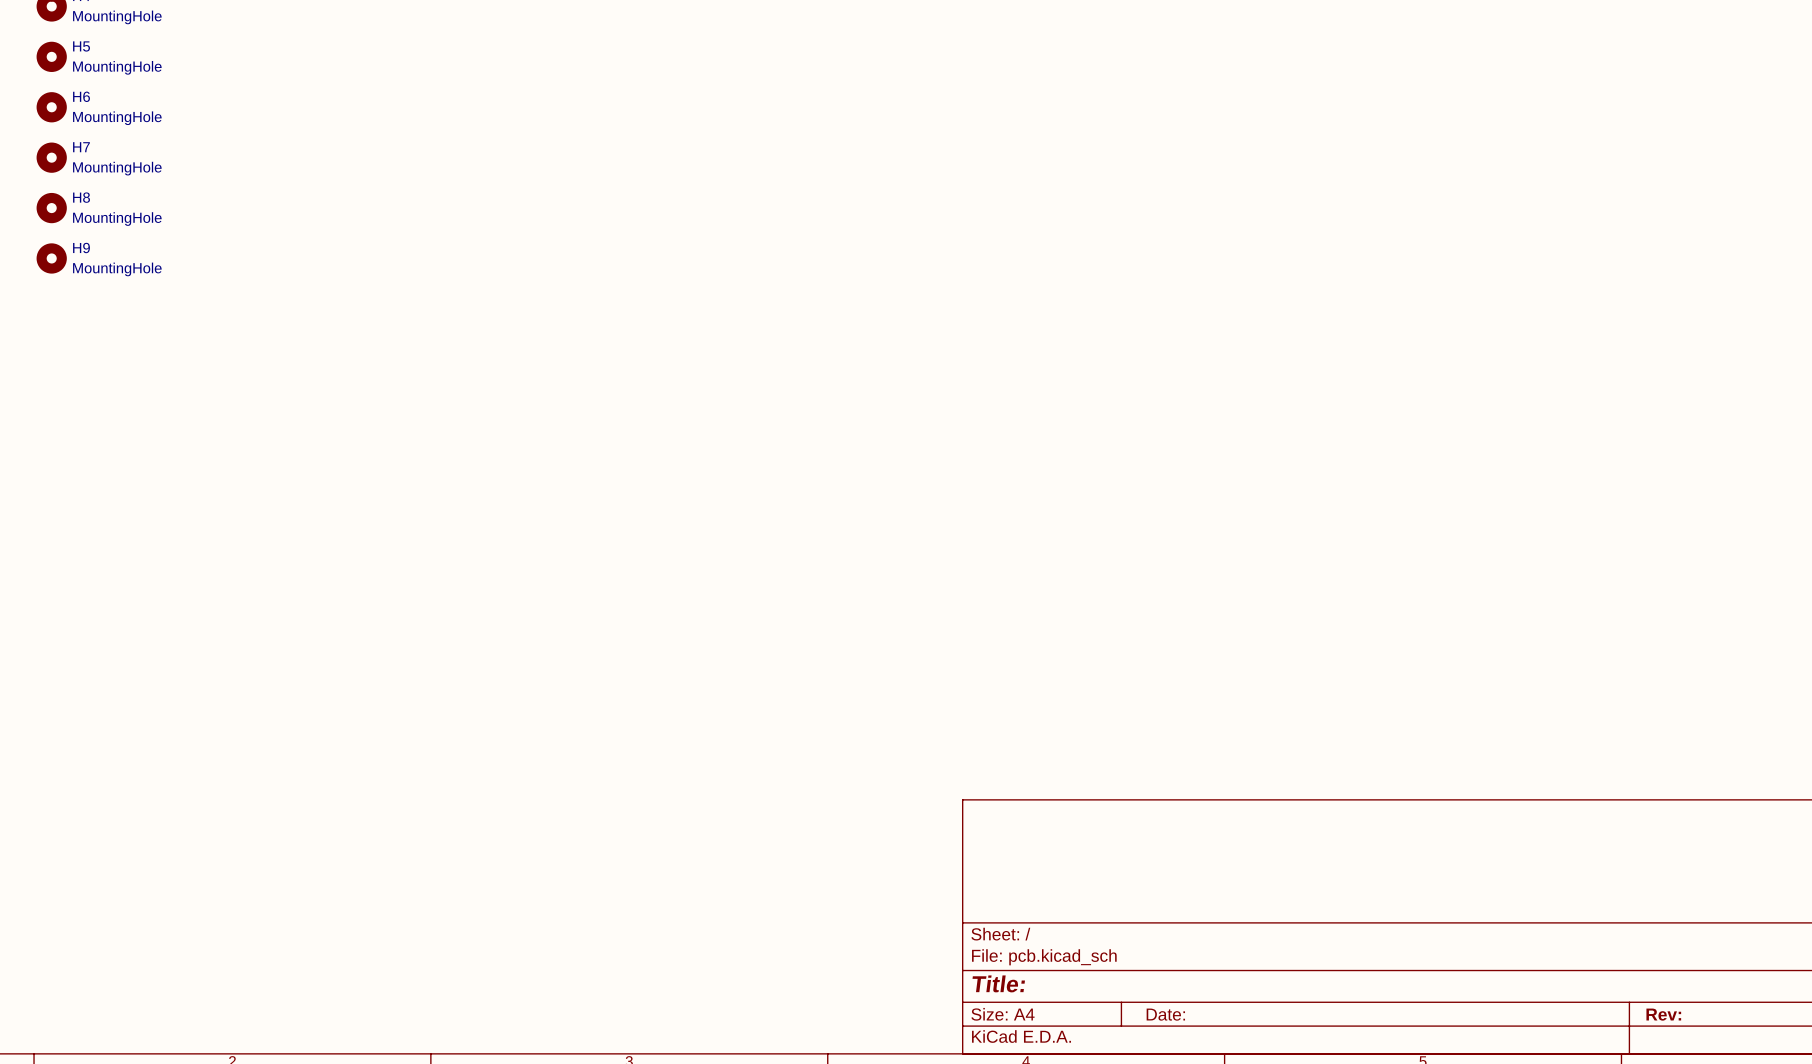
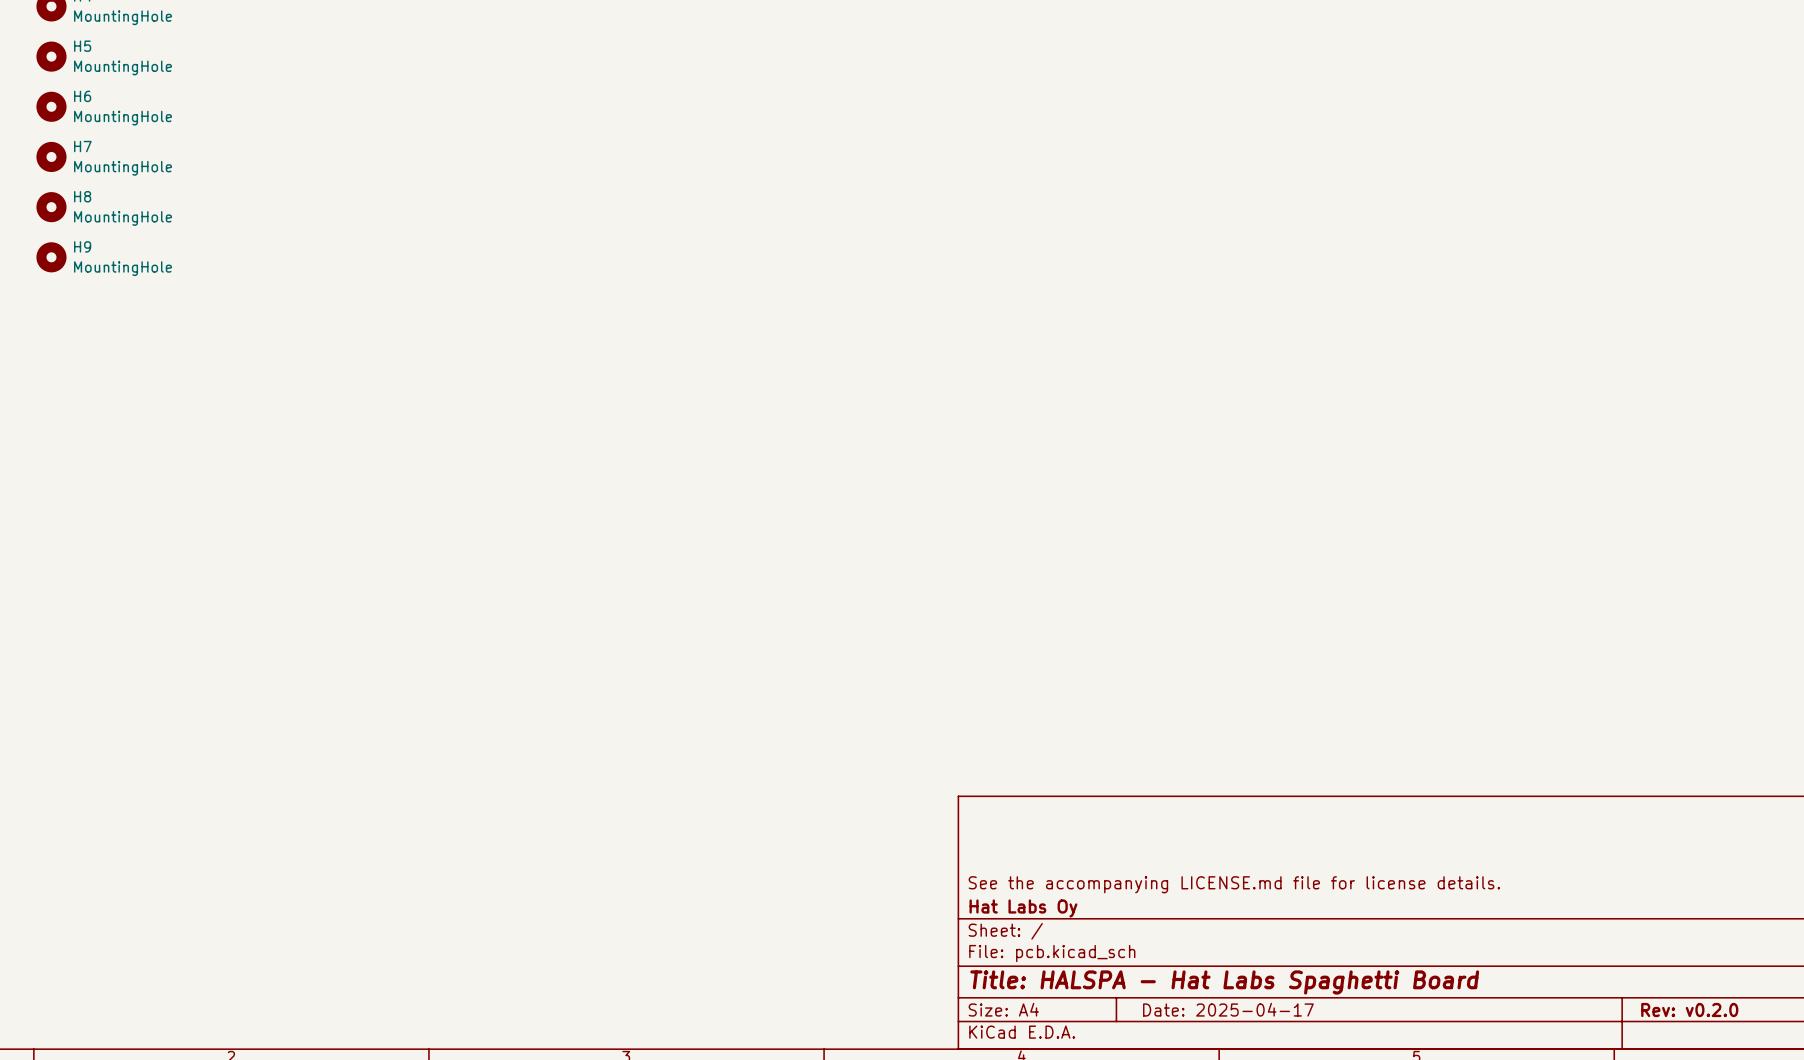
title block: none -> See the accompanying LICENSE.md file for license details. (1234, 884)
title block: none -> Hat Labs Oy (1023, 908)
title block: Title: (998, 983) -> Title: HALSPA - Hat Labs Spaghetti Board (1224, 982)
title block: Date: (1165, 1014) -> Date: 2025-04-17 (1228, 1009)
title block: Rev: (1663, 1014) -> Rev: v0.2.0 (1689, 1010)

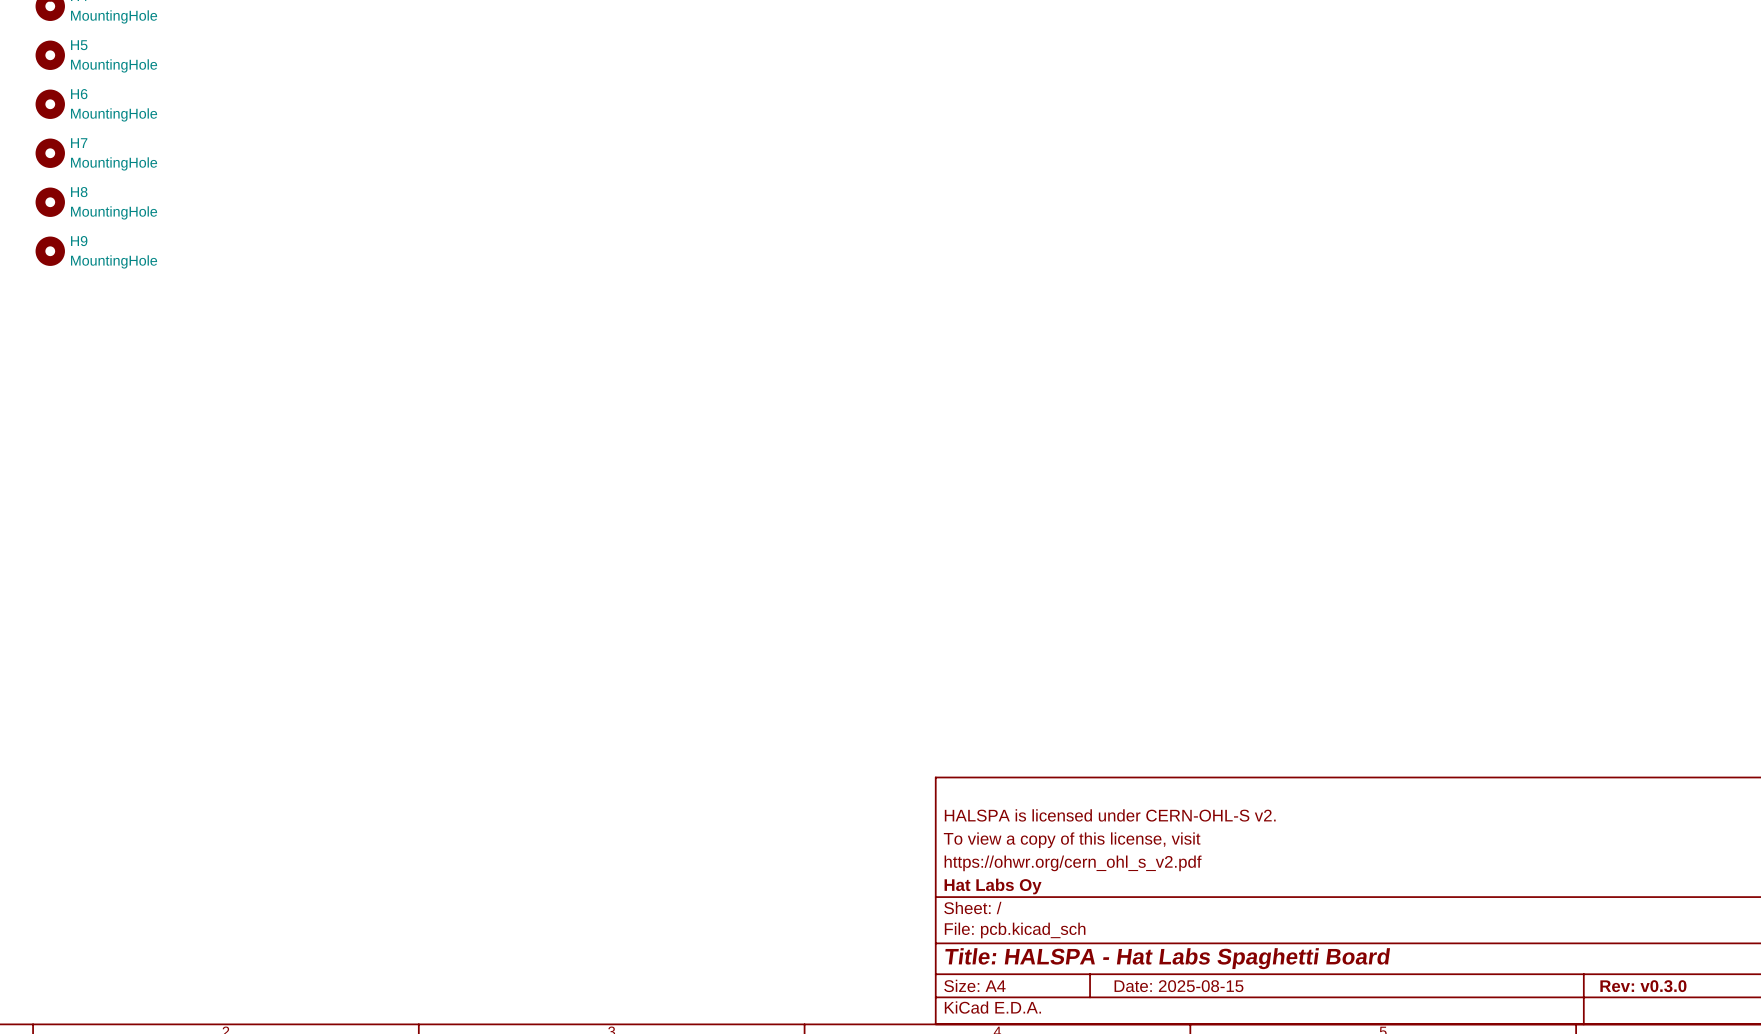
title block: none -> HALSPA is licensed under CERN-OHL-S v2. (1110, 815)
title block: none -> To view a copy of this license, visit (1072, 840)
title block: See the accompanying LICENSE.md file for license details. (1234, 884) -> https://ohwr.org/cern_ohl_s_v2.pdf (1073, 863)
title block: Date: 2025-04-17 (1228, 1009) -> Date: 2025-08-15 (1178, 986)
title block: Rev: v0.2.0 (1689, 1010) -> Rev: v0.3.0 (1643, 986)

